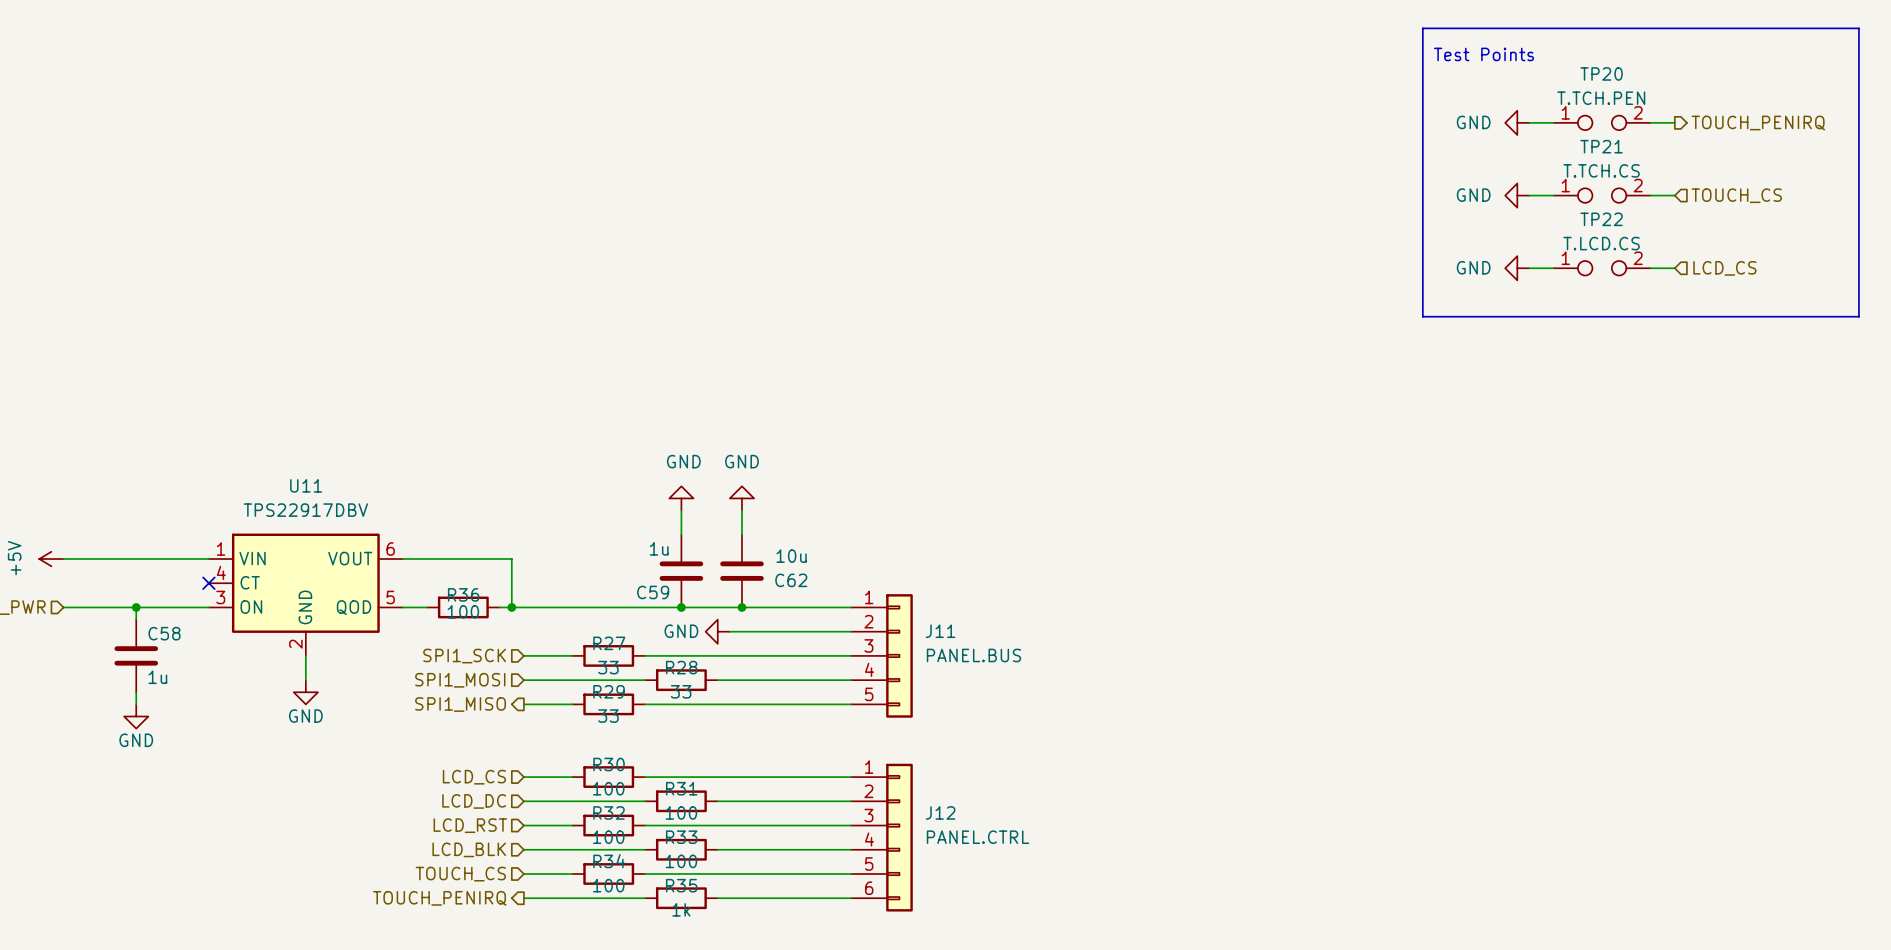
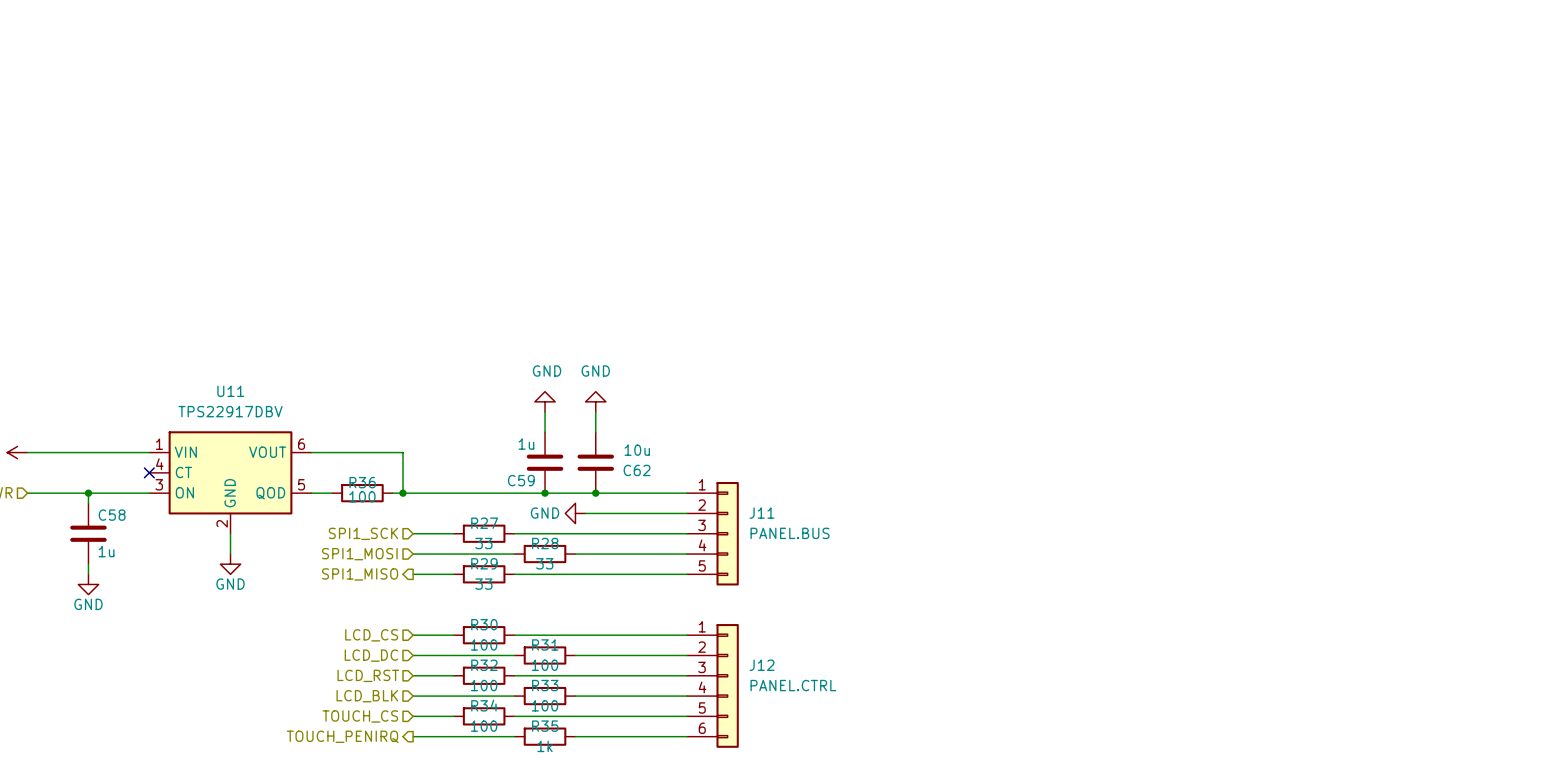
line: (1422, 28) (1858, 28) (1858, 316) (1422, 316) (1422, 28) -> none
text: Test Points (1483, 54) -> none
power symbol: GND (1517, 122) -> none
wire: (1529, 122) (1553, 122) -> none
TP20: T.TCH.PEN (1602, 122) -> none
wire: (1650, 122) (1674, 122) -> none
hierarchical label: TOUCH_PENIRQ (1758, 123) -> none
power symbol: GND (1517, 195) -> none
wire: (1529, 195) (1553, 195) -> none
TP21: T.TCH.CS (1602, 195) -> none
wire: (1650, 195) (1674, 195) -> none
hierarchical label: TOUCH_CS (1736, 195) -> none
power symbol: GND (1517, 268) -> none
wire: (1529, 268) (1553, 268) -> none
TP22: T.LCD.CS (1602, 268) -> none
wire: (1650, 268) (1674, 268) -> none
hierarchical label: LCD_CS (1724, 268) -> none

